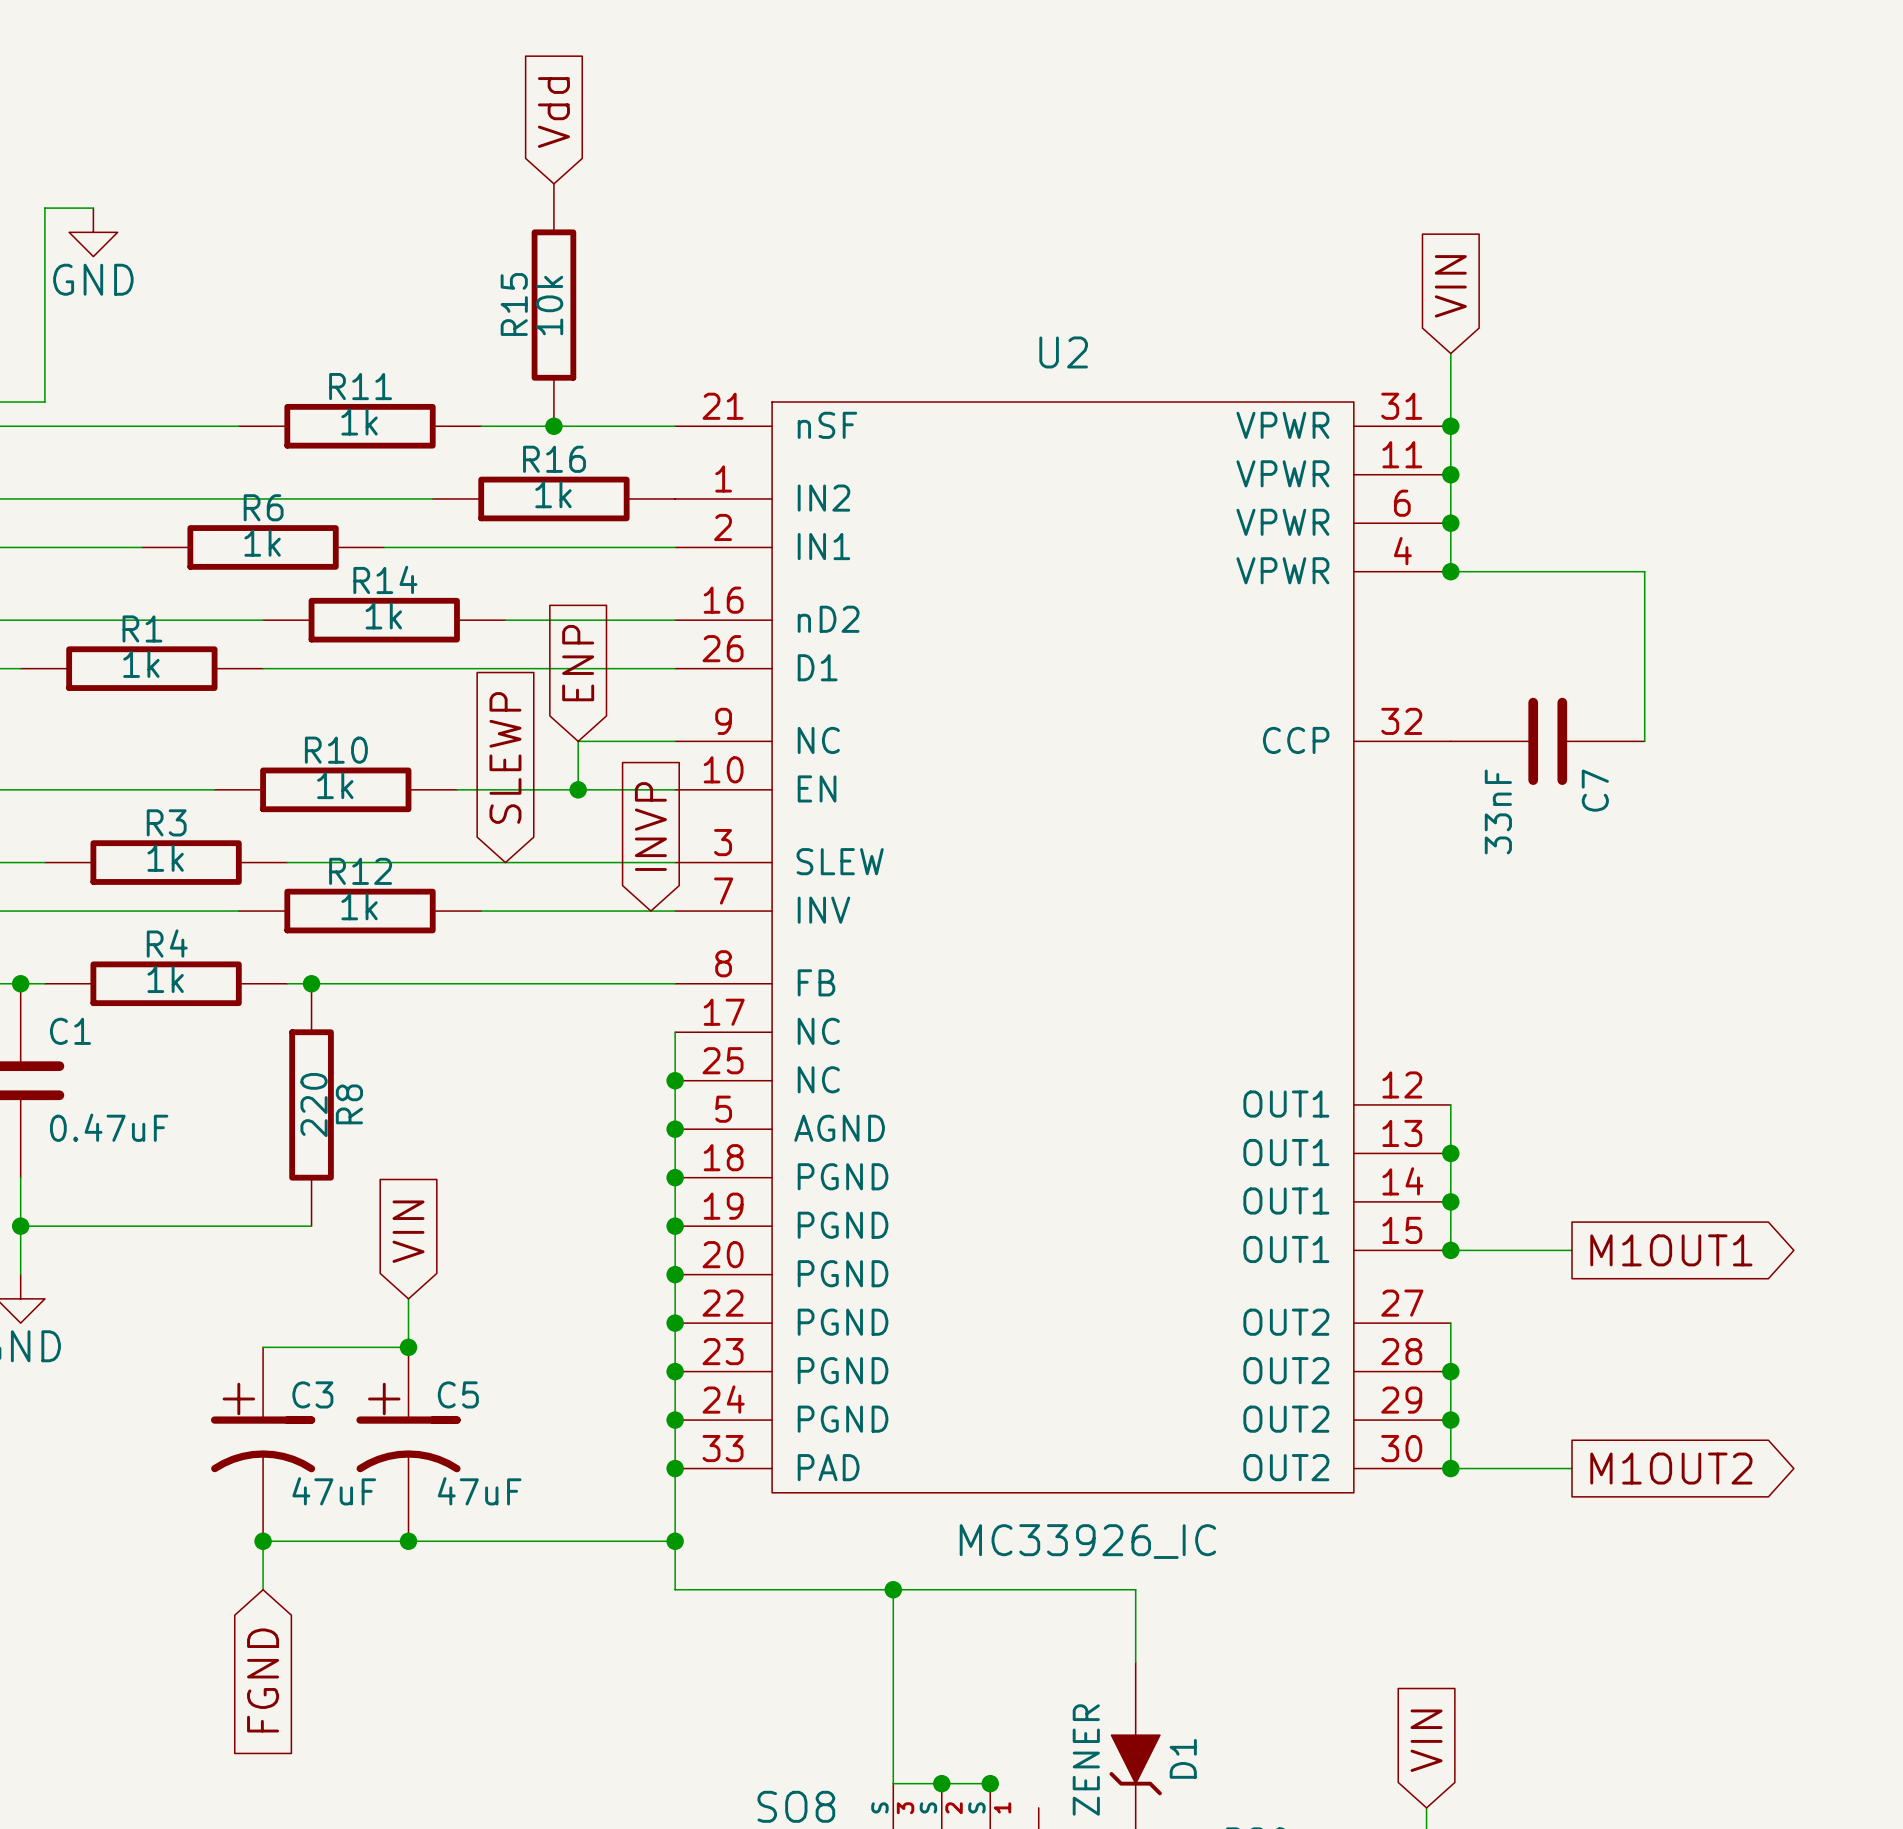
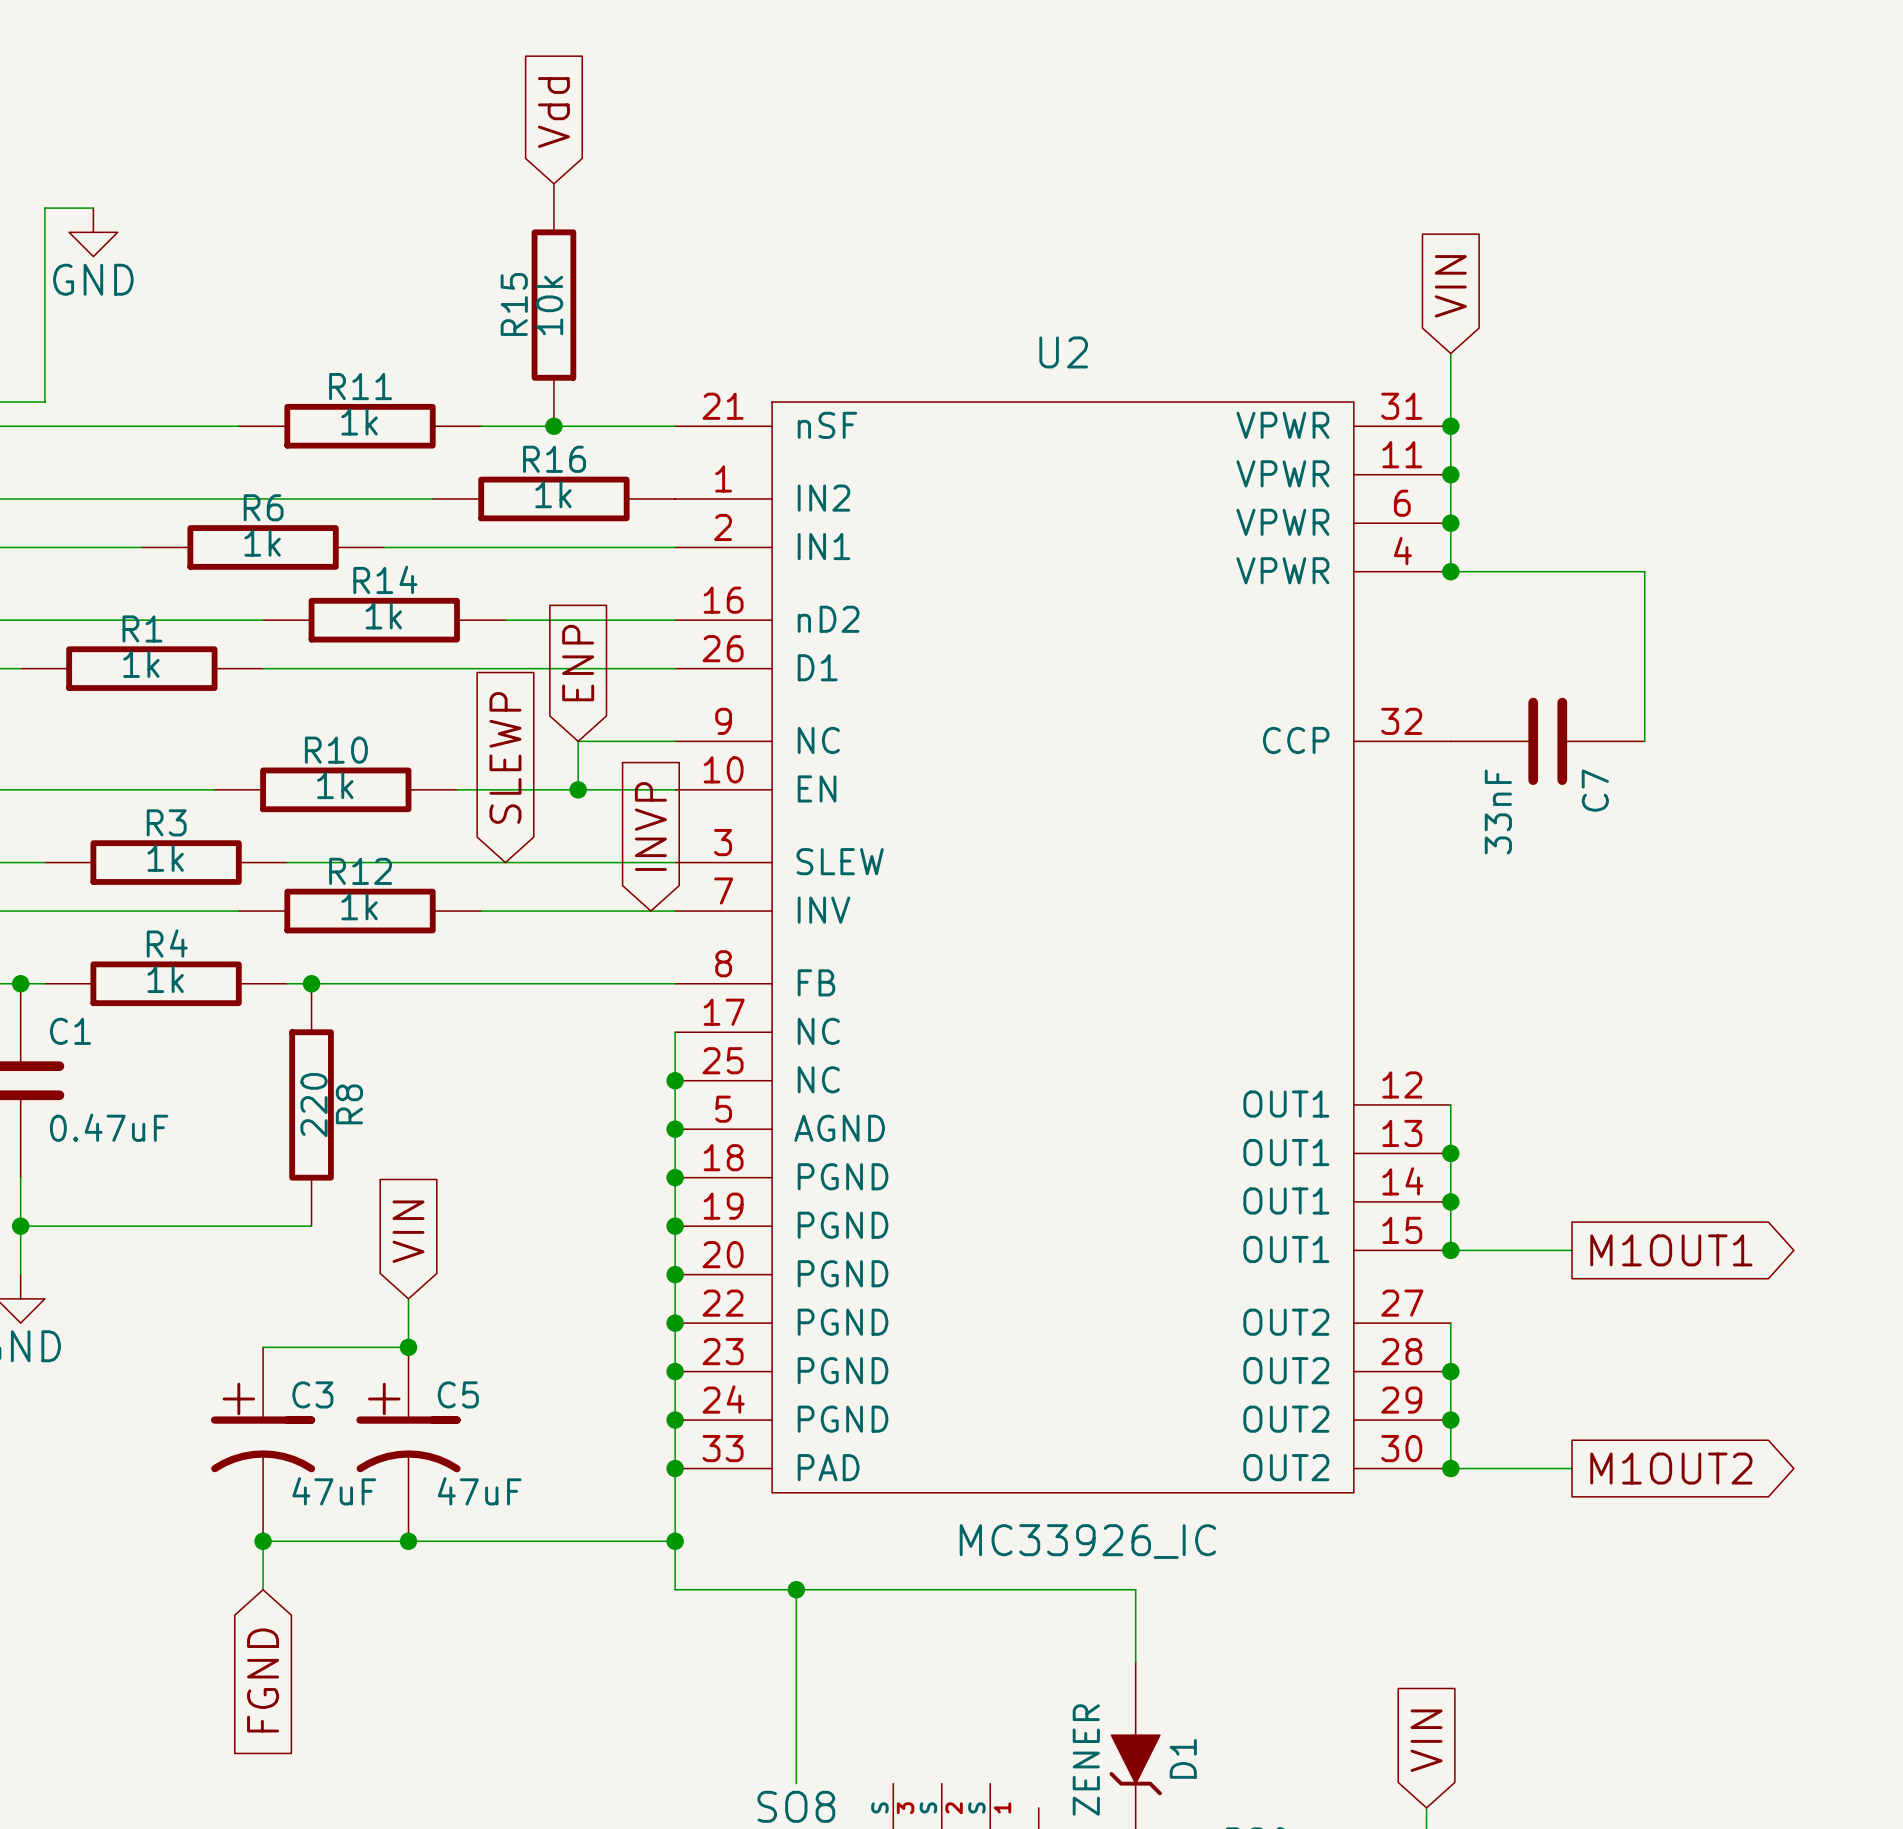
wire: none -> (796, 1589) (796, 1783)
wire: (893, 1589) (893, 1783) (990, 1783) -> none
junction position: (893, 1589) -> (796, 1589)
junction: (941, 1783) -> none
junction: (990, 1783) -> none

